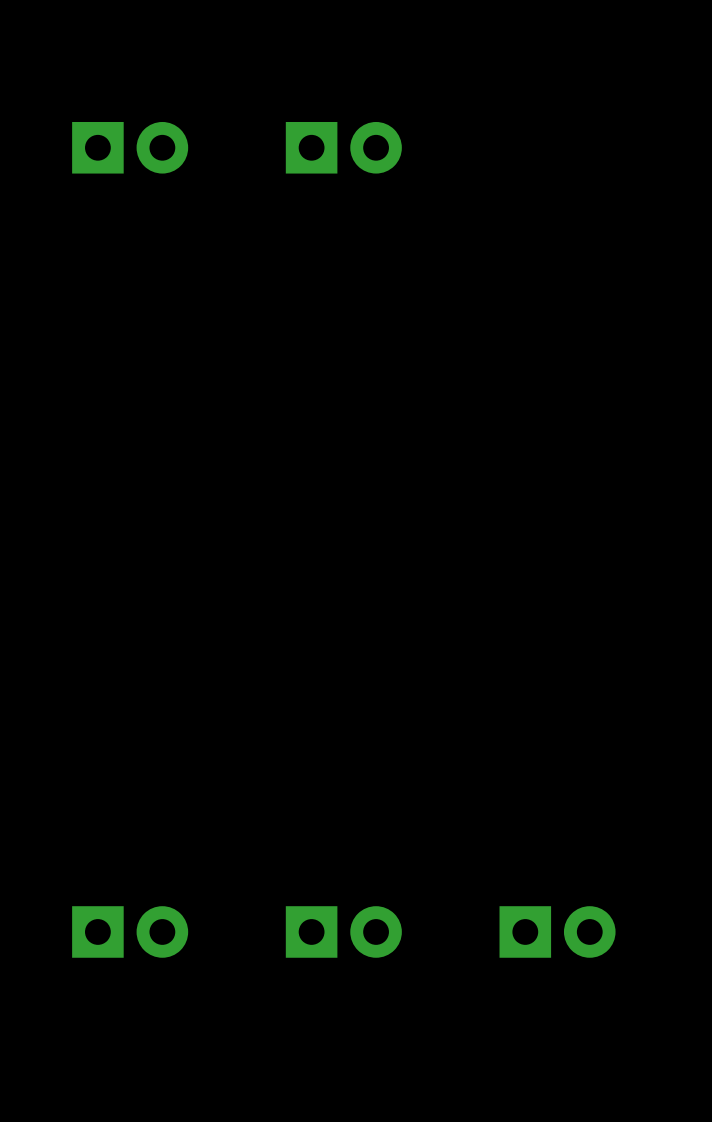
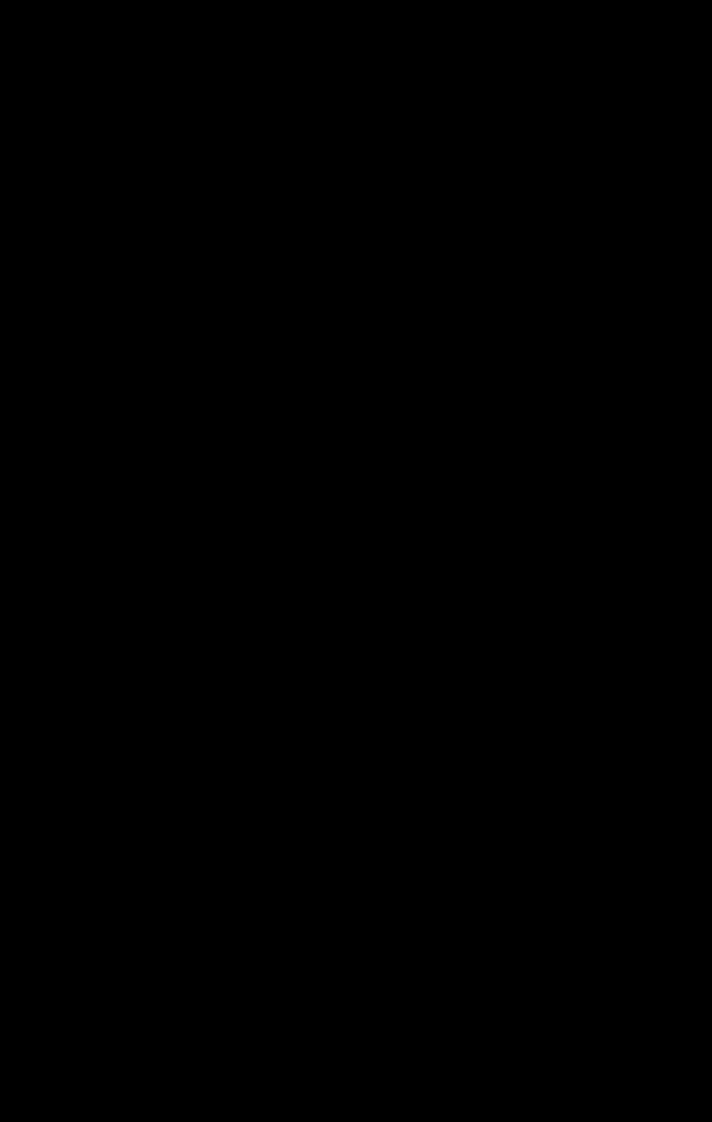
part: (130, 147) -> none
part: (343, 147) -> none
part: (130, 931) -> none
part: (343, 931) -> none
part: (557, 931) -> none

